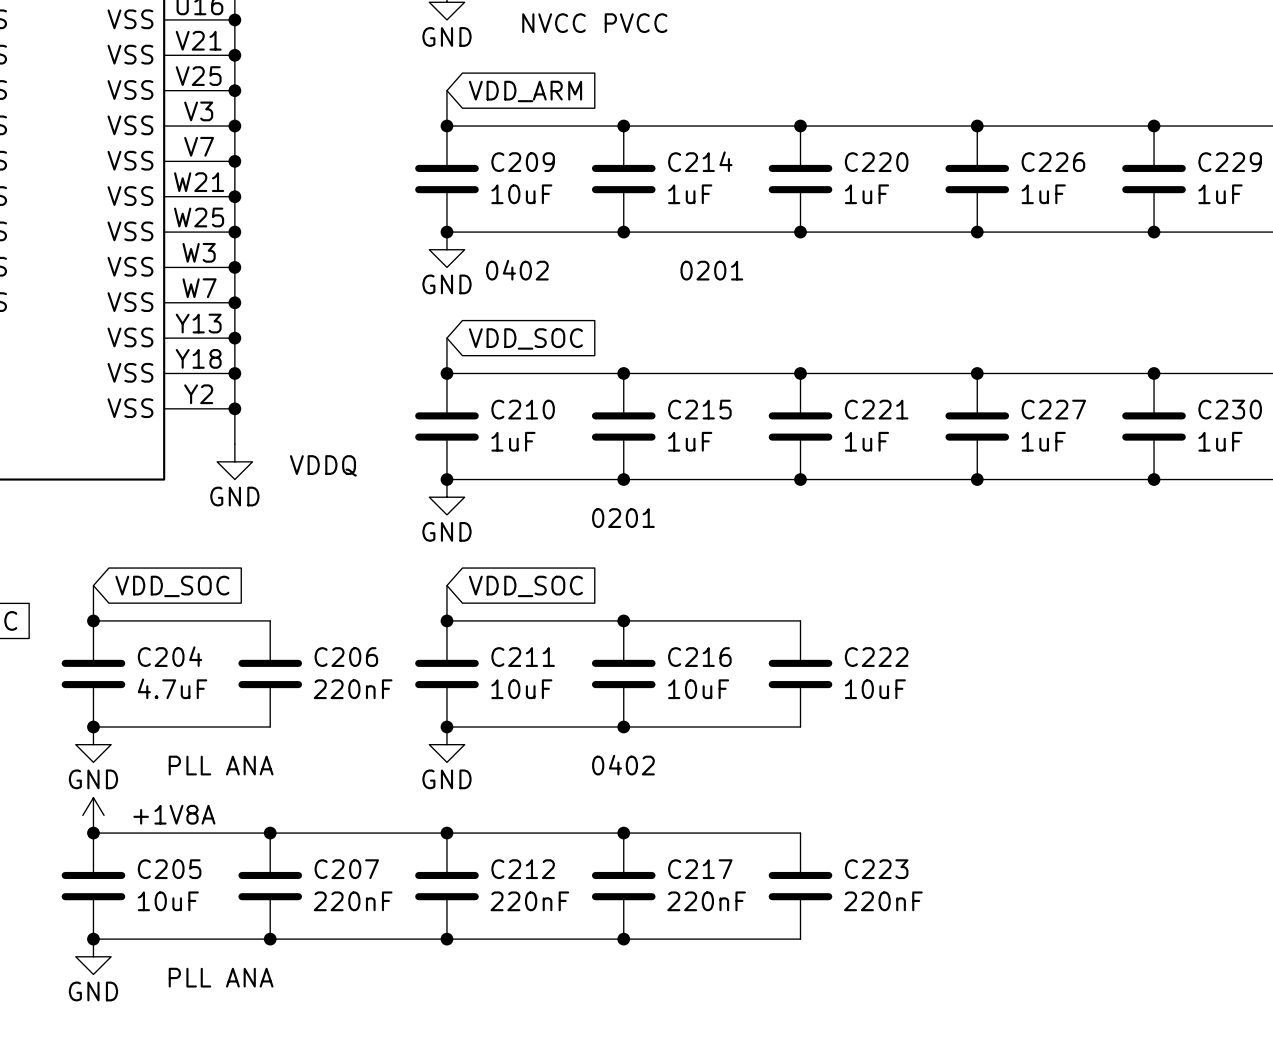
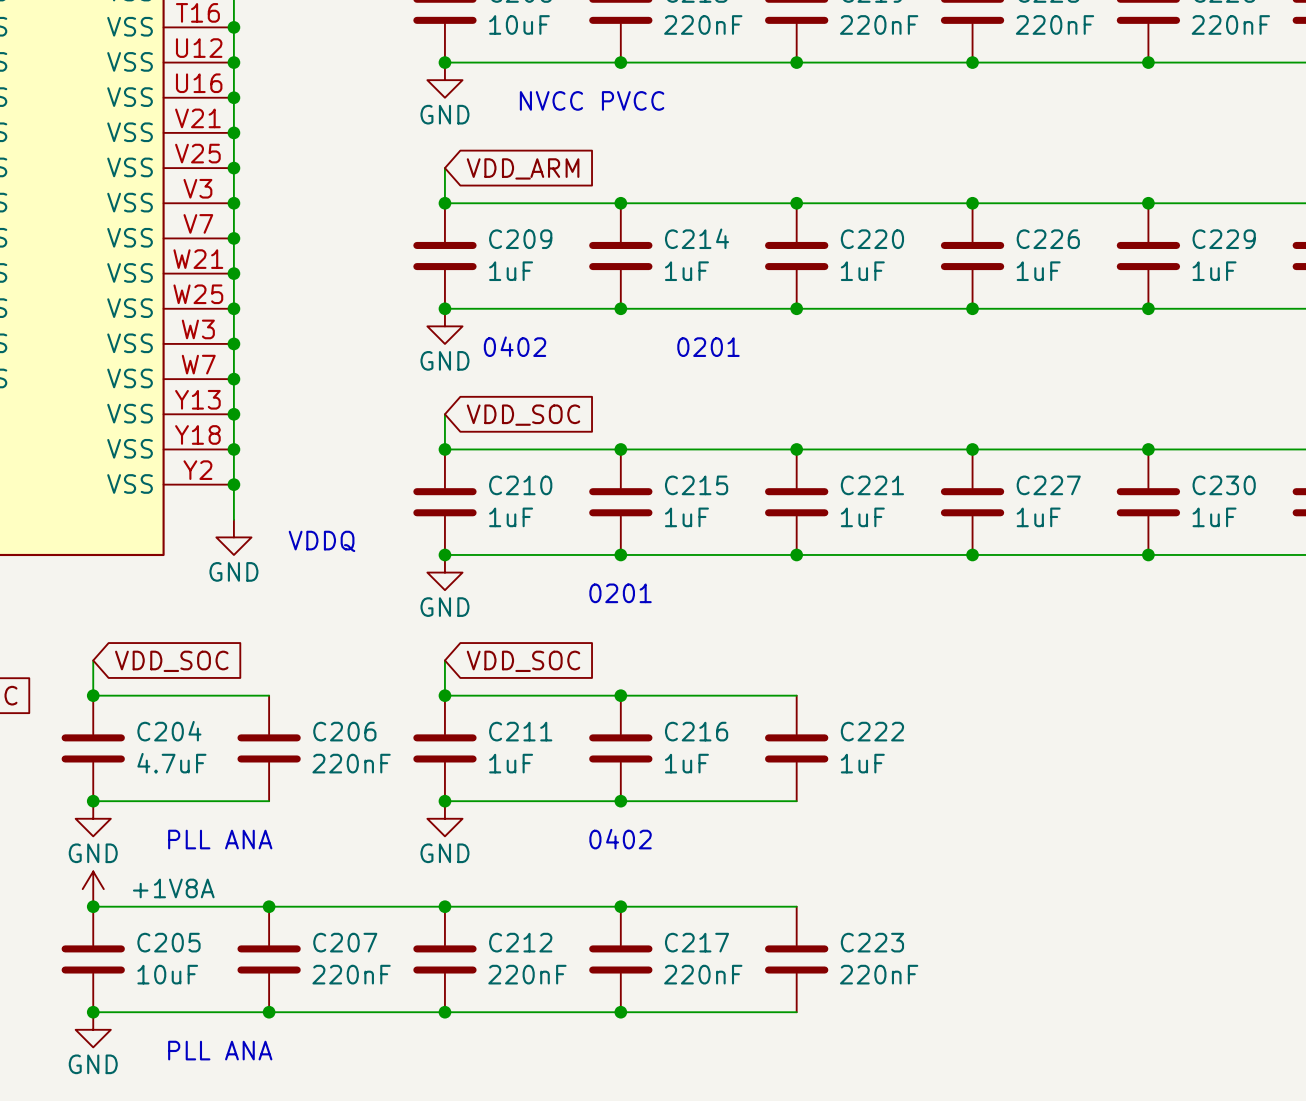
C209 value: 10uF (521, 194) -> 1uF (511, 271)
C211 value: 10uF (521, 689) -> 1uF (511, 763)
C216 value: 10uF (698, 689) -> 1uF (686, 763)
C222 value: 10uF (875, 689) -> 1uF (862, 763)

